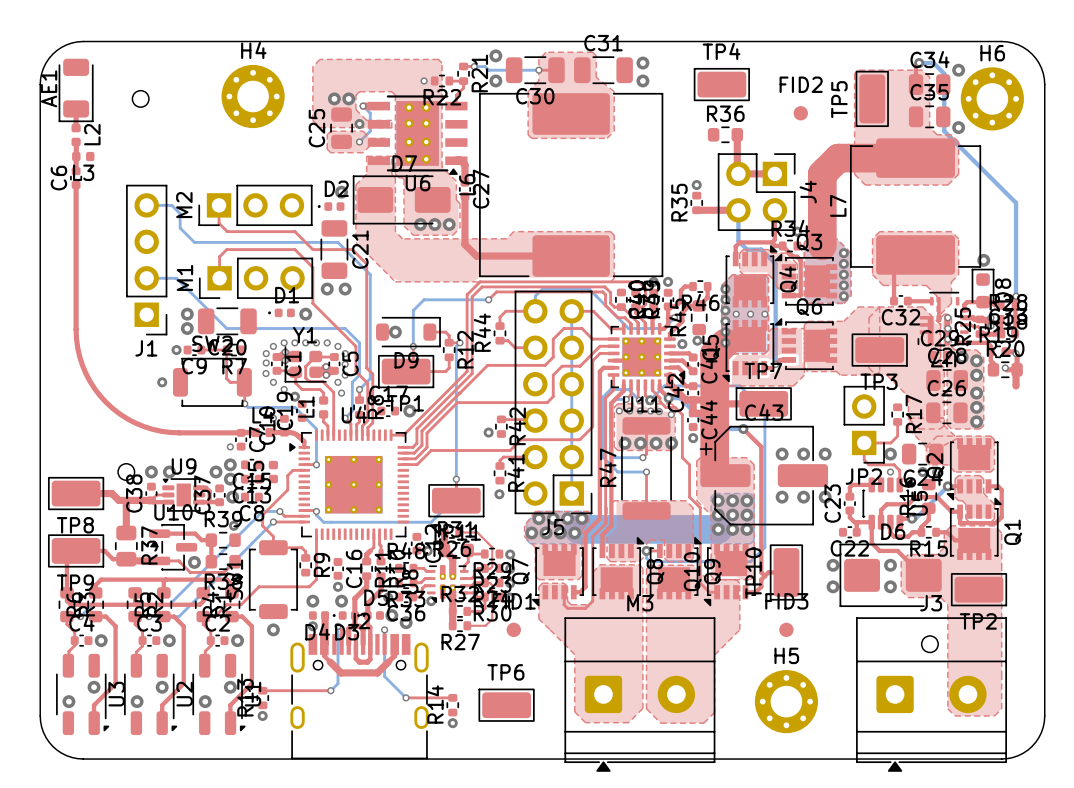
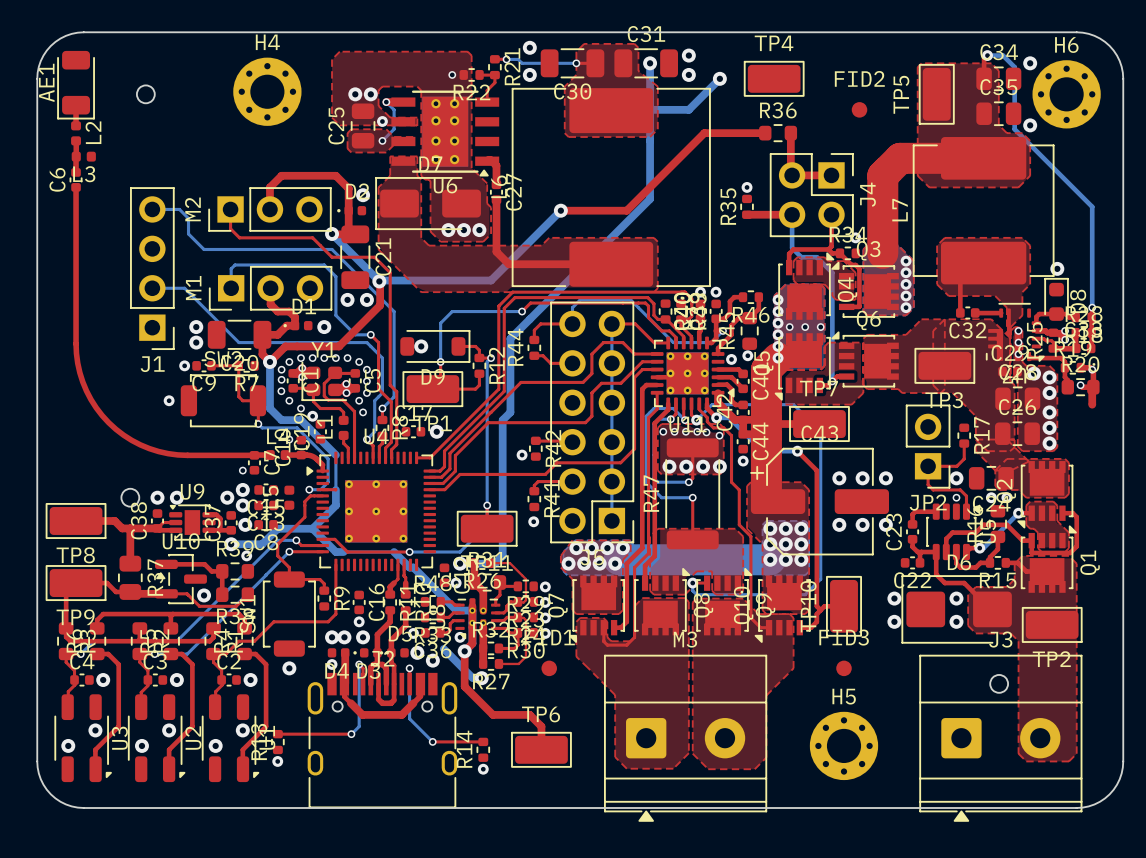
bottom track: none -> (650, 63) (650, 199) (510, 338) (510, 412) (502, 420) (502, 555) (494, 563) (460, 563)
via: none -> (650, 63)
bottom track: none -> (719, 78) (688, 109) (650, 109)
via: none -> (719, 78)
top track: none -> (765, 133) (704, 133) (626, 210) (560, 210)
top track: none -> (269, 209) (269, 187) (281, 175) (335, 175) (348, 188) (348, 227) (355, 234) (332, 233)
bottom track: none -> (560, 210) (491, 280) (379, 281)
via: none -> (560, 210)
bottom track: none -> (332, 233) (379, 281)
via: none -> (332, 233)
bottom track: (312, 242) (337, 242) (370, 274) (370, 299) -> (332, 249) (394, 311)
top track: none -> (379, 281) (380, 305) (339, 346) (285, 346) (269, 361) (262, 354) (262, 334) (277, 334) (286, 325) (295, 325) (295, 317) (289, 311) (277, 311) (270, 304) (270, 288)
via: none -> (379, 281)
top track: (219, 278) (219, 256) (226, 249) (294, 249) (312, 267) (312, 303) (355, 346) -> (370, 334) (378, 342) (378, 361)
bottom track: none -> (231, 288) (231, 268) (235, 265) (324, 265) (335, 276) (335, 315) (355, 334) (370, 334)
via: none -> (370, 334)
bottom track: none -> (269, 361) (269, 408) (281, 420) (300, 420) (335, 455)
via: none -> (269, 361)
bottom track: (280, 407) (294, 407) (316, 428) (316, 432) -> (297, 427) (328, 458) (328, 482) (320, 489) (309, 489)
bottom track: none -> (335, 489) (335, 505) (312, 528)
via position: (316, 464) -> (309, 489)
bottom track: none -> (312, 528) (277, 528) (262, 544) (231, 544)
top track: none -> (335, 540) (347, 552) (409, 552)
bottom track: (316, 511) (316, 515) (323, 522) -> (312, 528) (335, 552) (343, 552)
via: (316, 511) -> none
via: none -> (231, 544)
bottom track: (370, 522) (384, 522) -> (394, 552) (409, 567) (413, 567) (456, 610) (472, 610) (472, 643) (464, 651)
via: none -> (409, 552)
via: none -> (460, 563)
top track: none -> (472, 606) (472, 643) (464, 651) (464, 686) (492, 714) (529, 714) (541, 726) (541, 749)
via: none -> (344, 637)
bottom track: none -> (443, 648) (472, 678)
via: none -> (464, 651)
via: none -> (481, 678)

